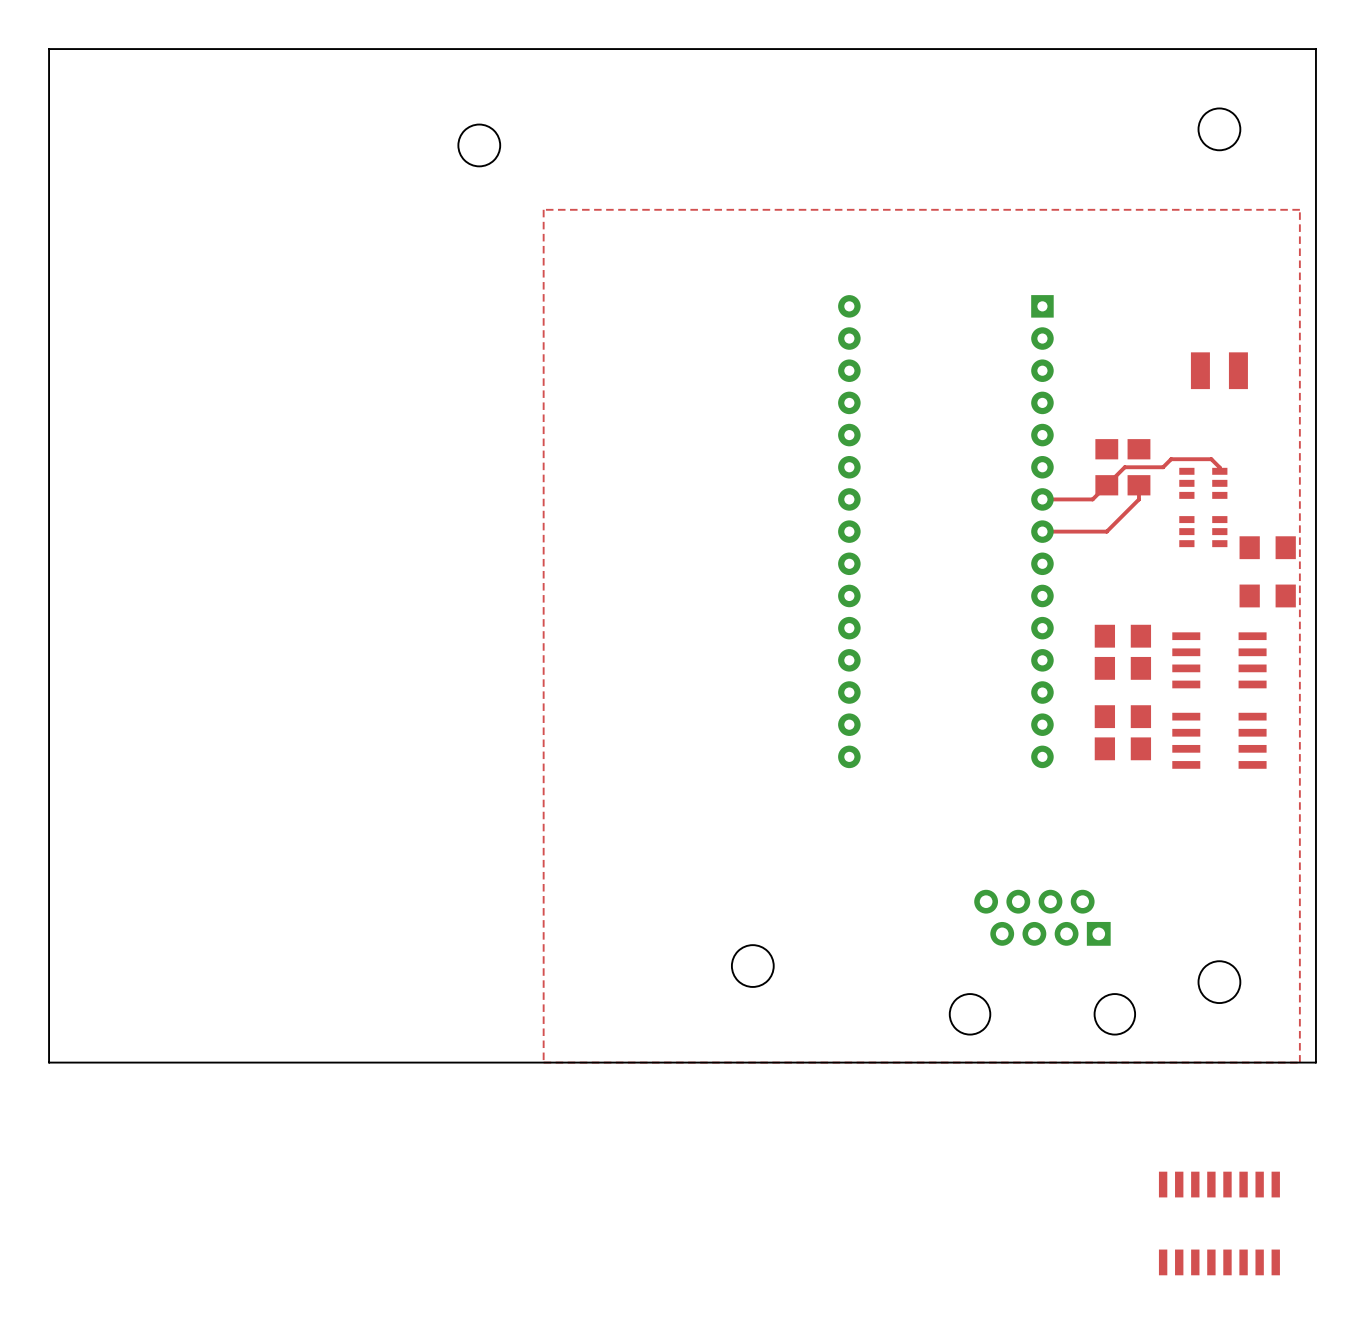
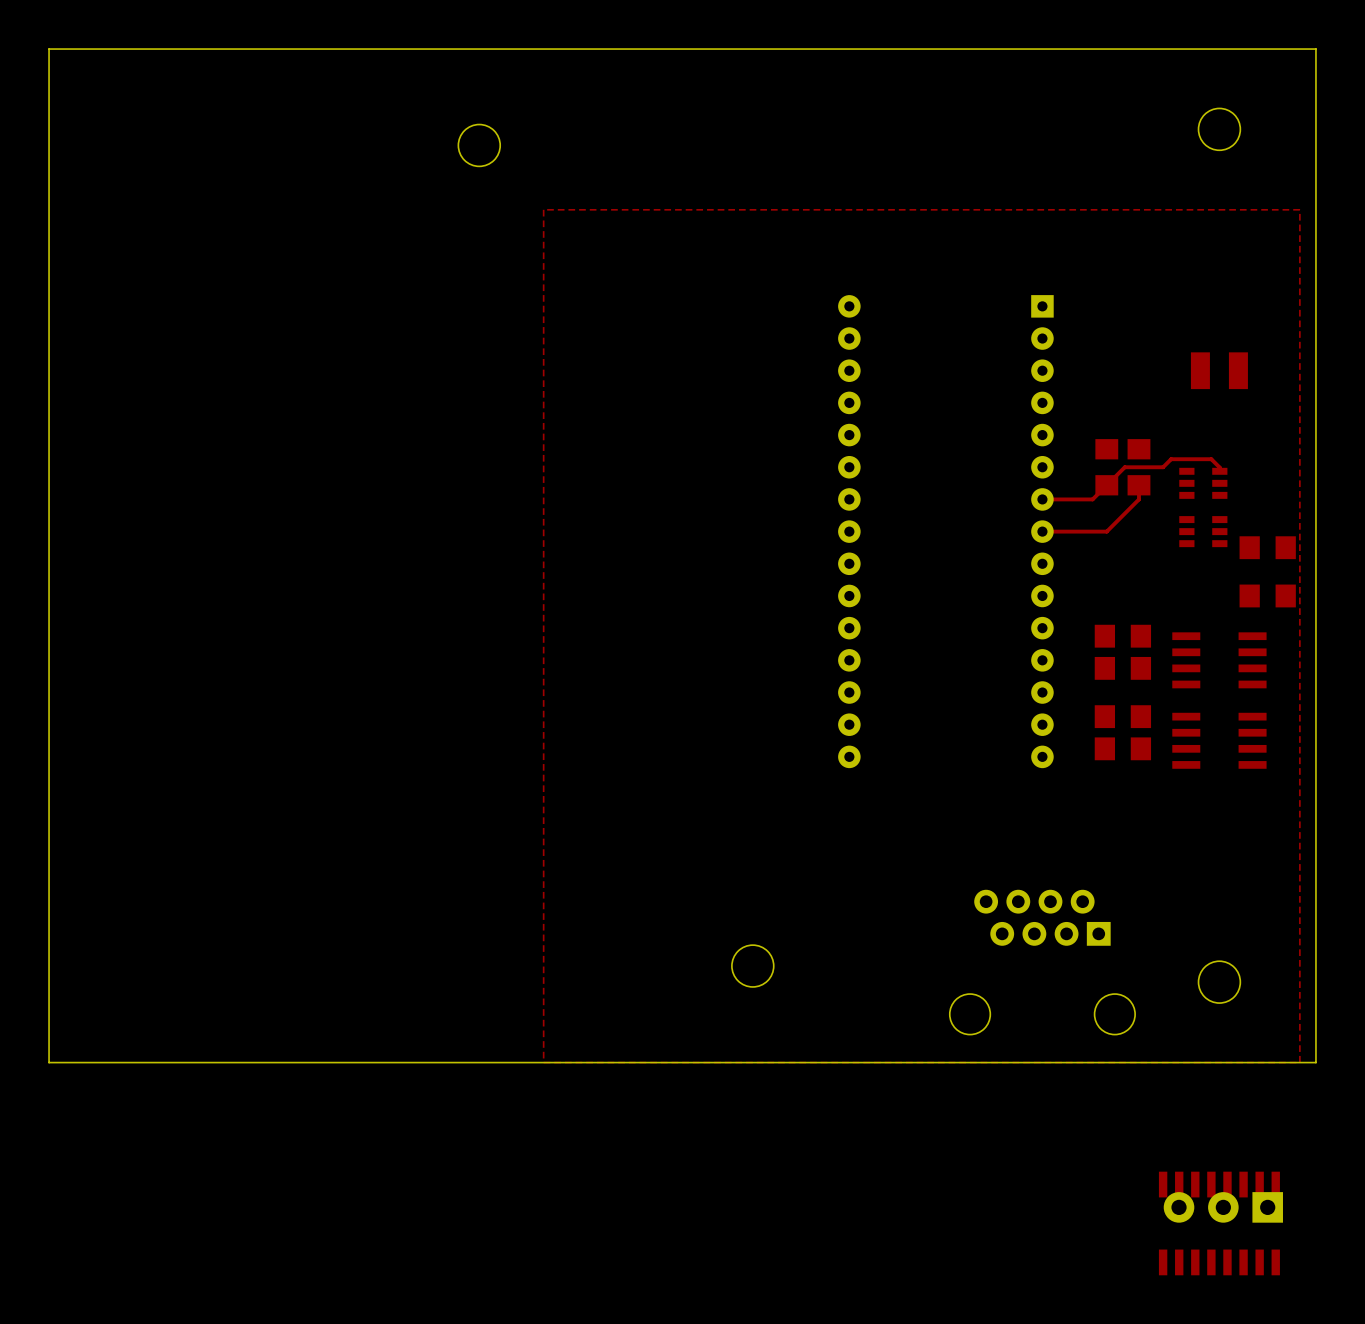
part: none -> (1223, 1207)

